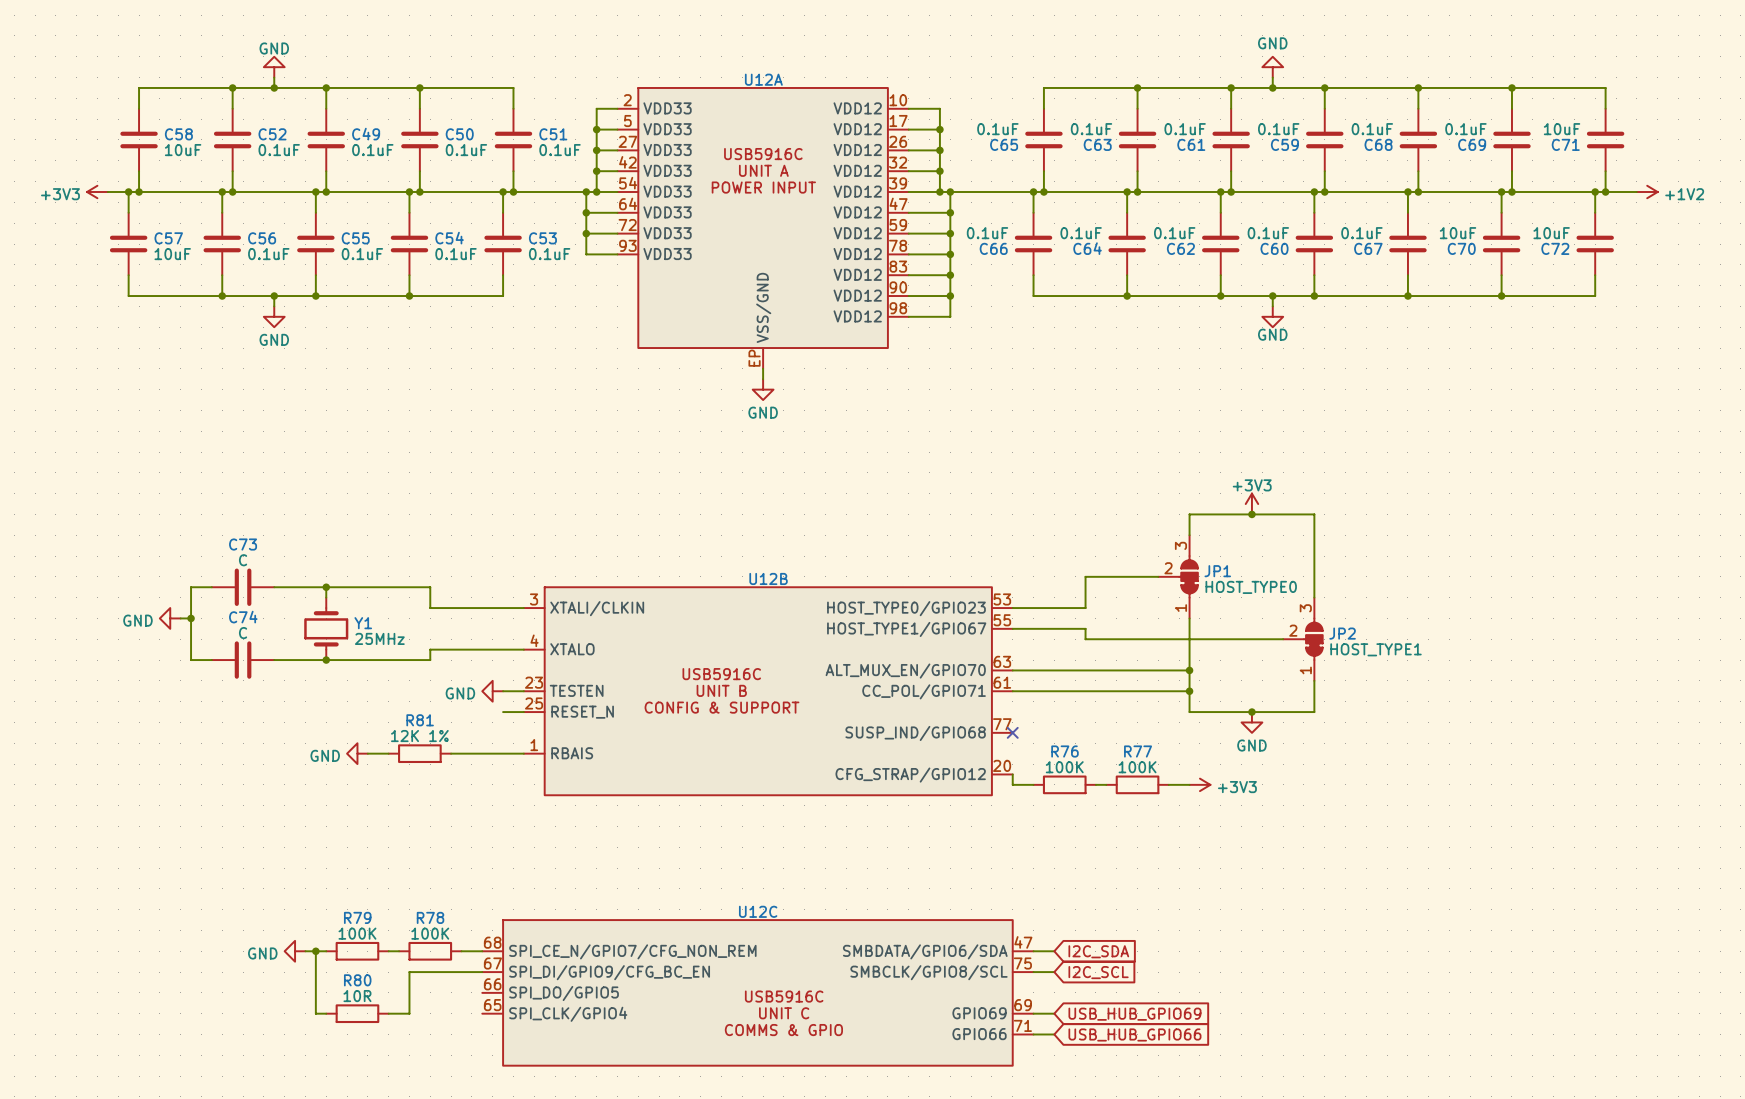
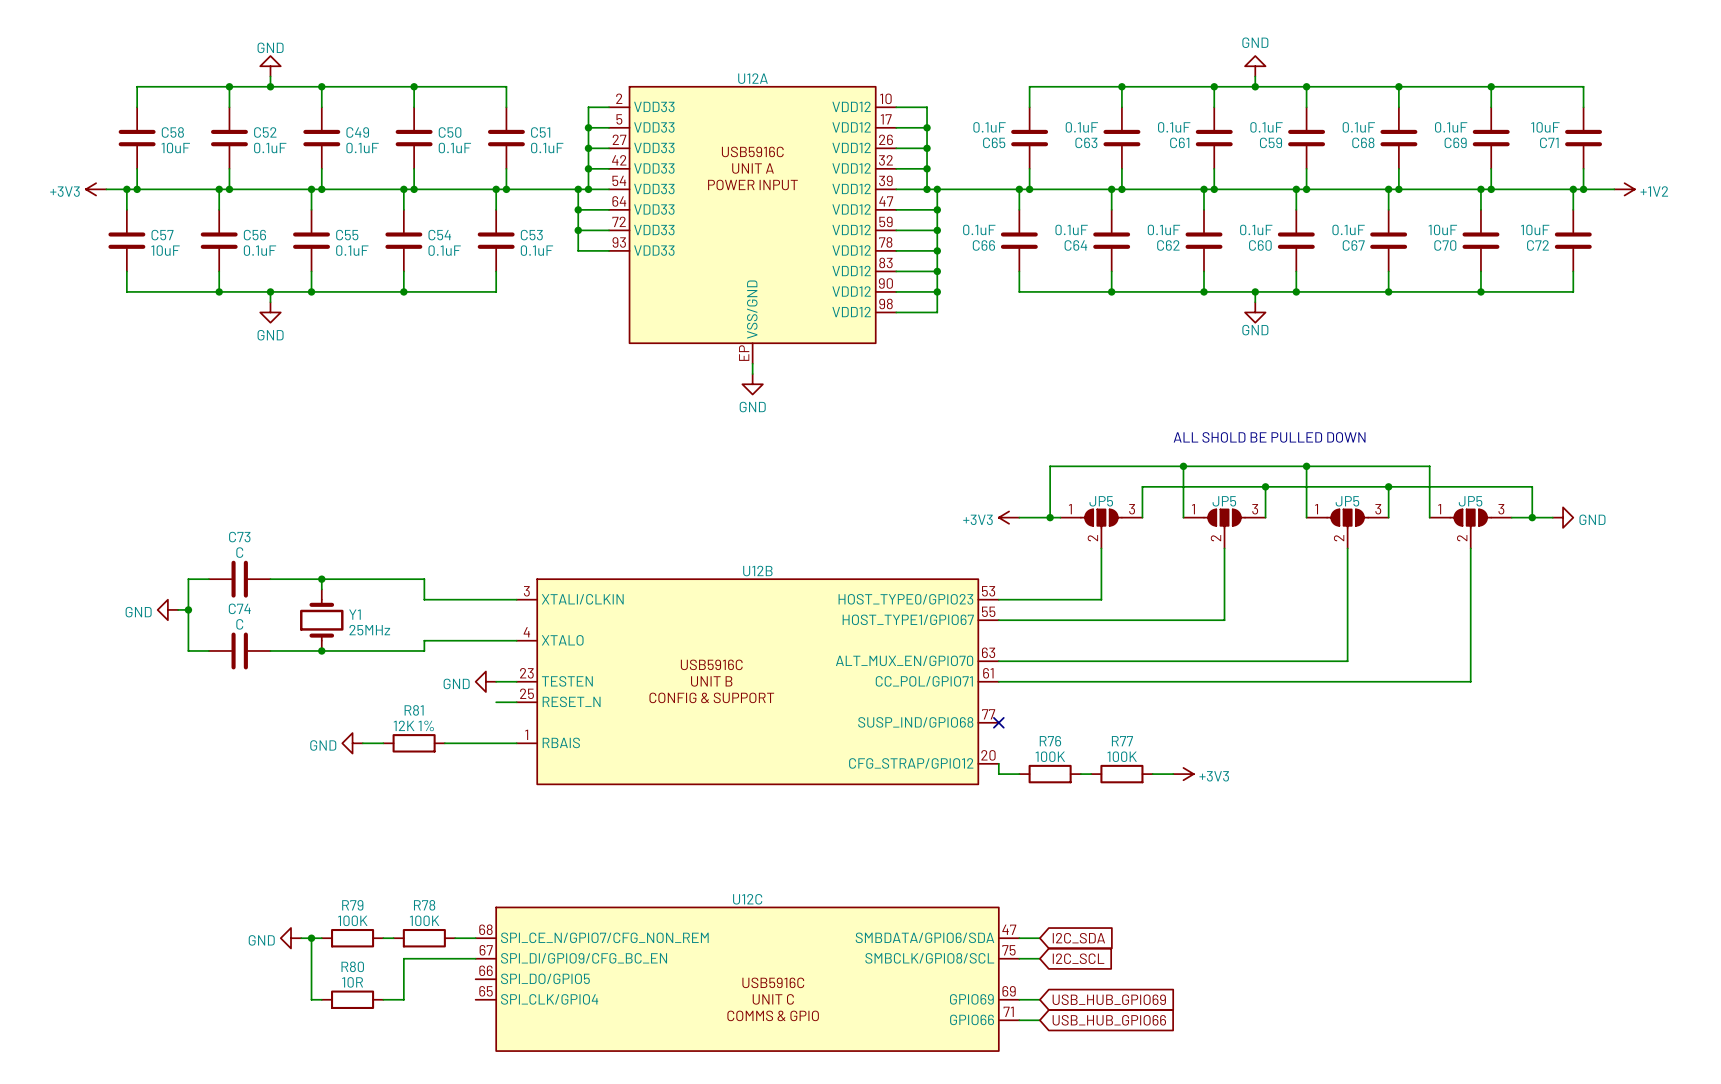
text: none -> ALL SHOLD BE PULLED DOWN (1269, 437)
wire: none -> (1183, 466) (1183, 517)
junction: none -> (1183, 466)
wire: none -> (1306, 466) (1306, 517)
junction: none -> (1306, 466)
wire: none -> (1265, 486) (1265, 517)
junction: none -> (1265, 486)
wire: none -> (1388, 486) (1388, 517)
junction: none -> (1388, 486)
power symbol: +3V3 (1251, 504) -> none
junction: (1251, 514) -> none
power symbol: none -> +3V3 (1009, 517)
wire: none -> (1019, 517) (1060, 517)
wire: none -> (1050, 517) (1050, 466) (1429, 466) (1429, 517)
junction: none -> (1050, 517)
wire: none -> (1142, 517) (1142, 486) (1532, 486) (1532, 517)
wire: none -> (1511, 517) (1552, 517)
junction: none -> (1532, 517)
power symbol: none -> GND (1563, 517)
wire: (1189, 535) (1189, 514) (1314, 514) (1314, 597) -> none
JP5: none -> (1101, 528)
JP5: none -> (1224, 528)
JP5: none -> (1347, 528)
JP5: none -> (1470, 528)
wire: none -> (1347, 548) (1347, 661) (1173, 661)
wire: none -> (1470, 548) (1470, 681) (1173, 681)
wire: (1158, 576) (1085, 576) (1085, 608) -> (1101, 548) (1101, 599) (1070, 599)
JP1: HOST_TYPE0 (1178, 576) -> none
wire: (1189, 618) (1189, 712) (1314, 712) (1314, 680) -> none
wire: (1085, 628) (1085, 639) (1283, 639) -> (1070, 620) (1224, 620) (1224, 548)
JP2: HOST_TYPE1 (1302, 639) -> none
junction: (1189, 670) -> none
junction: (1189, 691) -> none
junction: (1251, 712) -> none
power symbol: GND (1251, 722) -> none

